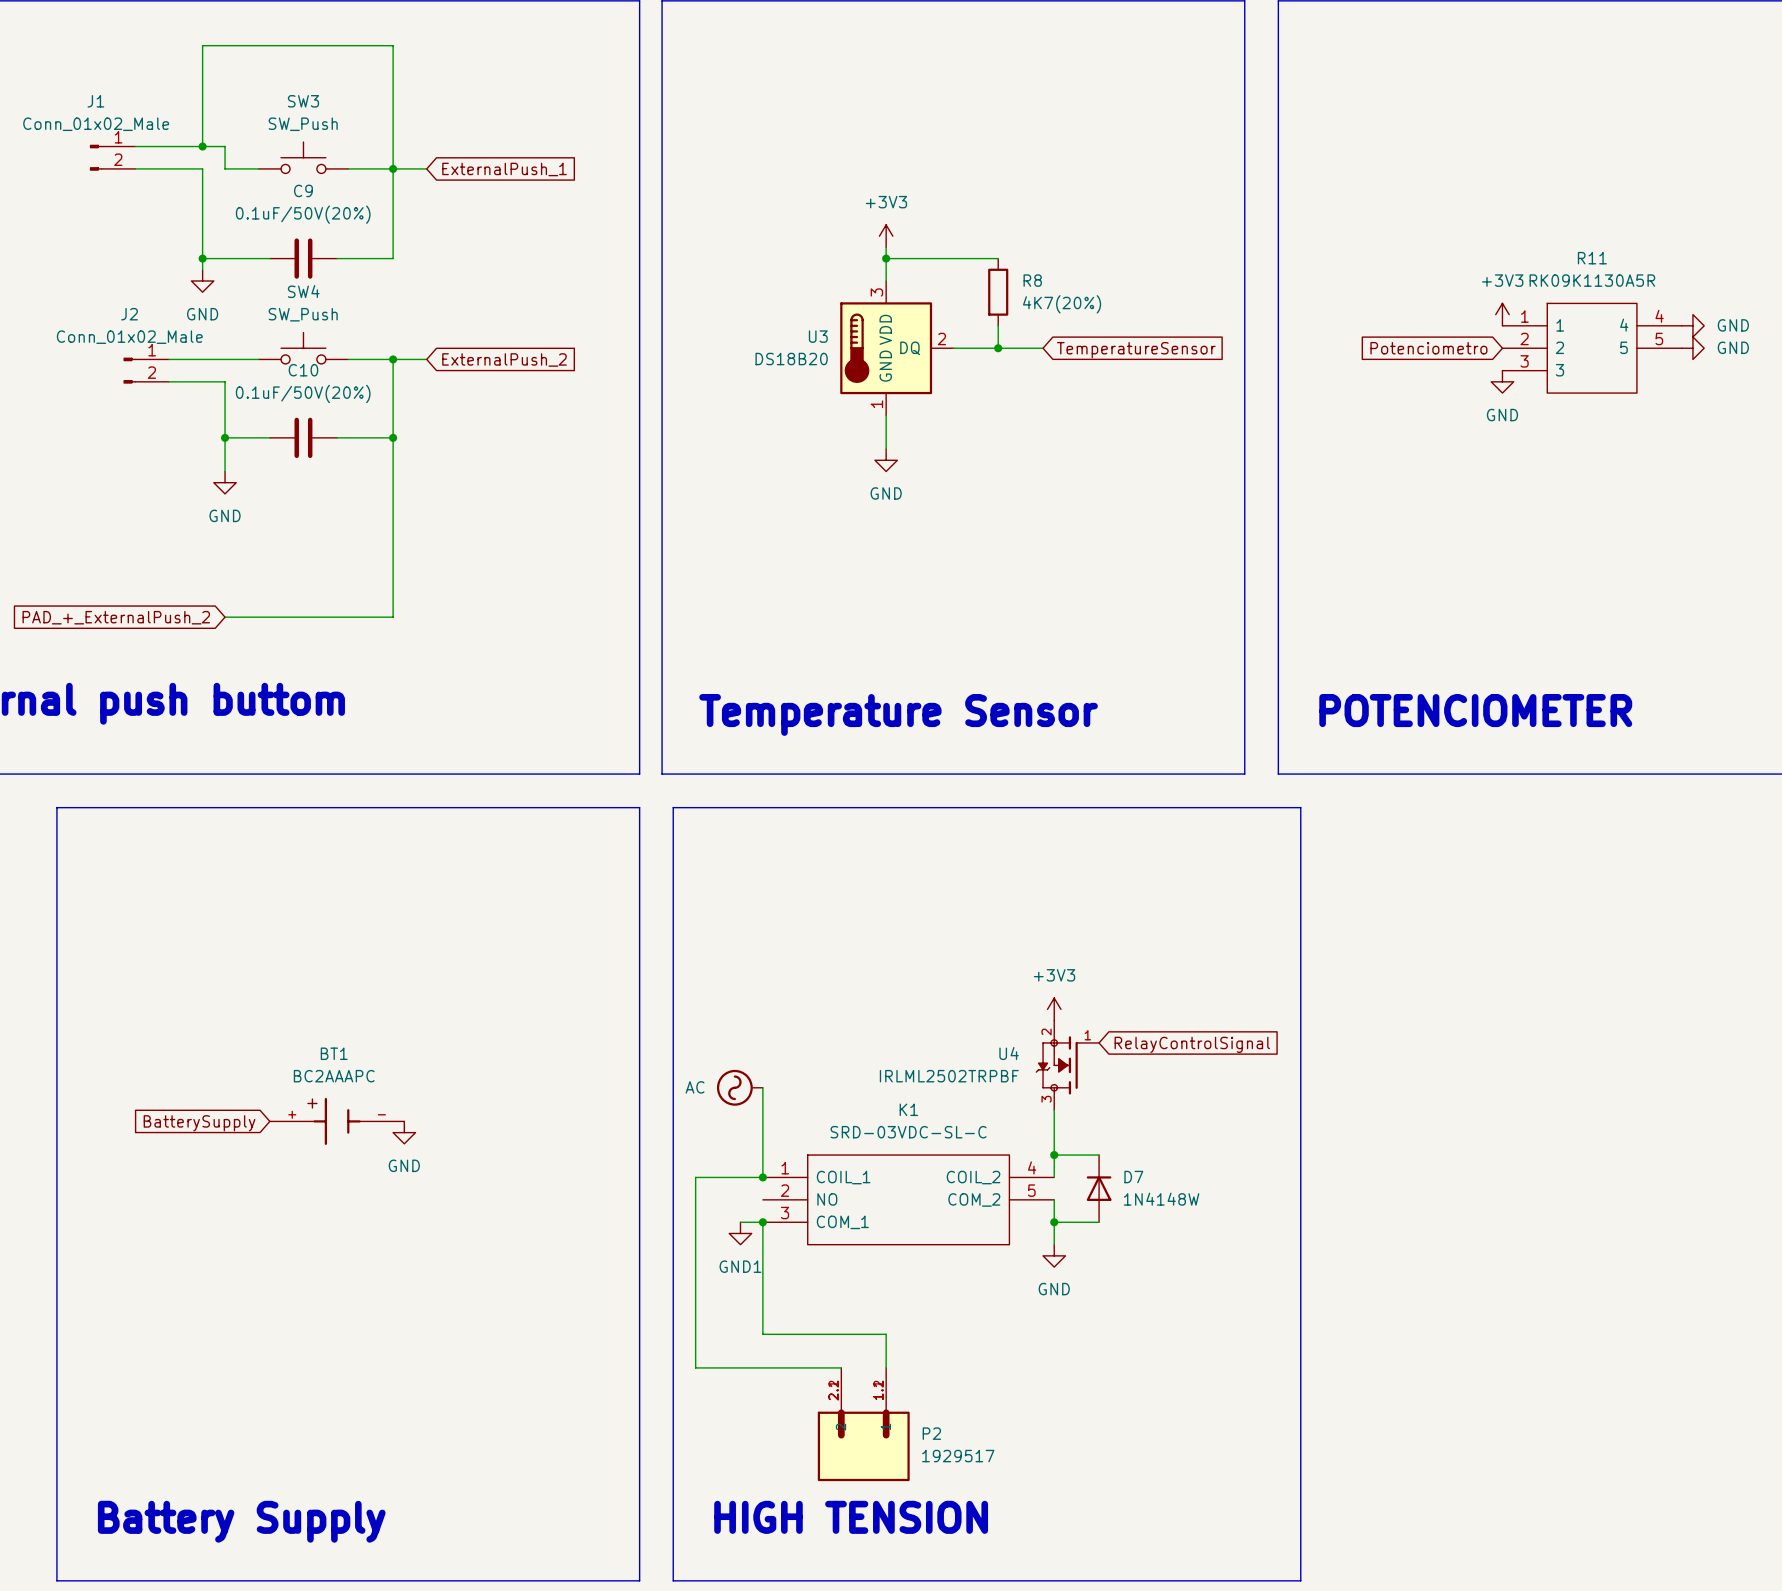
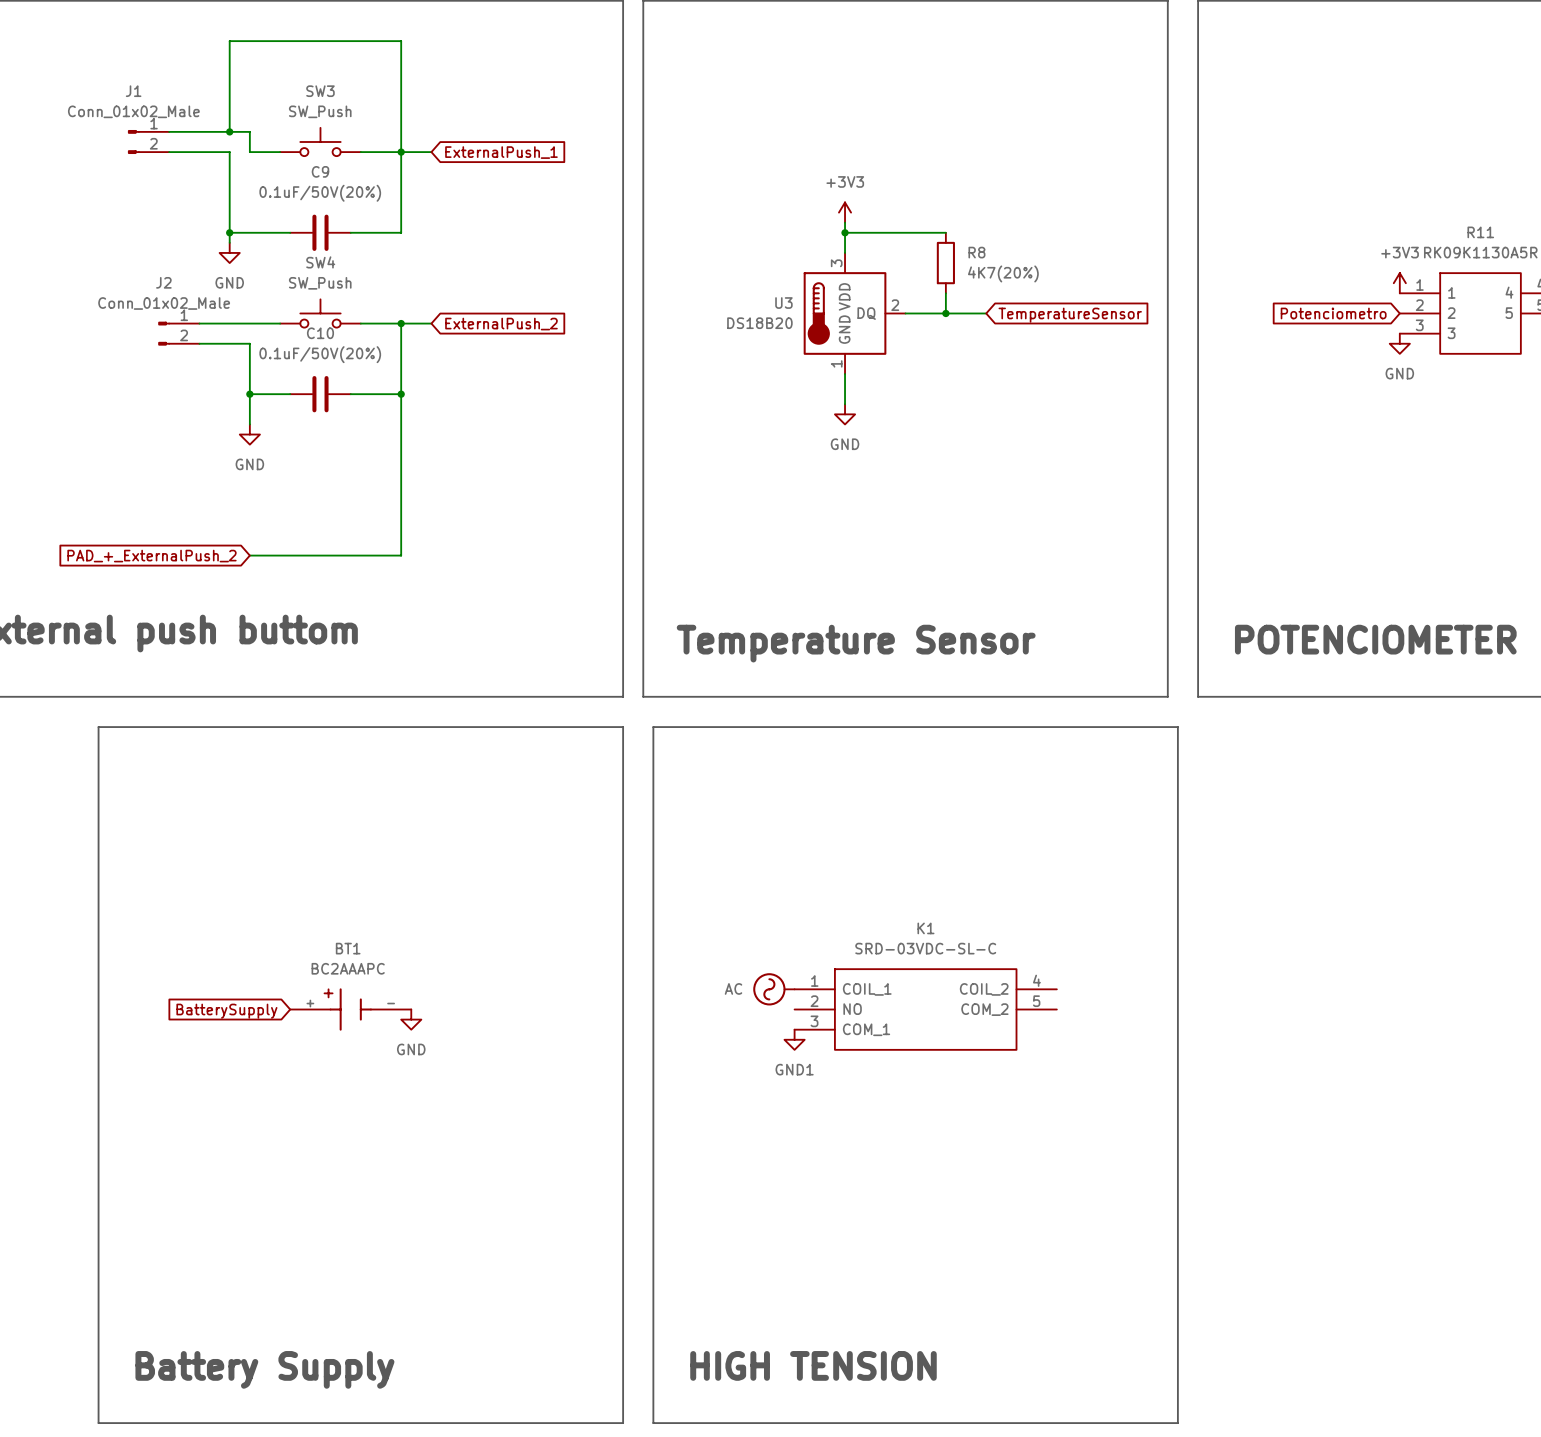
line: (1255, 807) (1300, 807) (1300, 1580) (1255, 1580) -> (1177, 727) (1177, 1423)
power symbol: +3V3 (1054, 1009) -> none
global label: RelayControlSignal (1192, 1044) -> none
U4: IRLML2502TRPBF (1067, 1065) -> none
power symbol position: AC (739, 1087) -> AC (773, 989)
wire: (762, 1087) (762, 1177) (695, 1177) (695, 1367) (841, 1367) -> none
wire: (1054, 1110) (1054, 1177) -> none
wire: (1054, 1155) (1099, 1155) -> none
junction: (1054, 1155) -> none
junction: (762, 1177) -> none
D7: 1N4148W (1099, 1188) -> none
K1 position: (908, 1199) -> (925, 1009)
wire: (1054, 1199) (1054, 1244) -> none
wire: (740, 1222) (762, 1222) (762, 1334) (886, 1334) (886, 1367) -> none
junction: (762, 1222) -> none
wire: (1054, 1222) (1099, 1222) -> none
junction: (1054, 1222) -> none
power symbol position: GND1 (740, 1233) -> GND1 (794, 1039)
power symbol: GND (1054, 1255) -> none
P2: 1929517 (863, 1424) -> none

